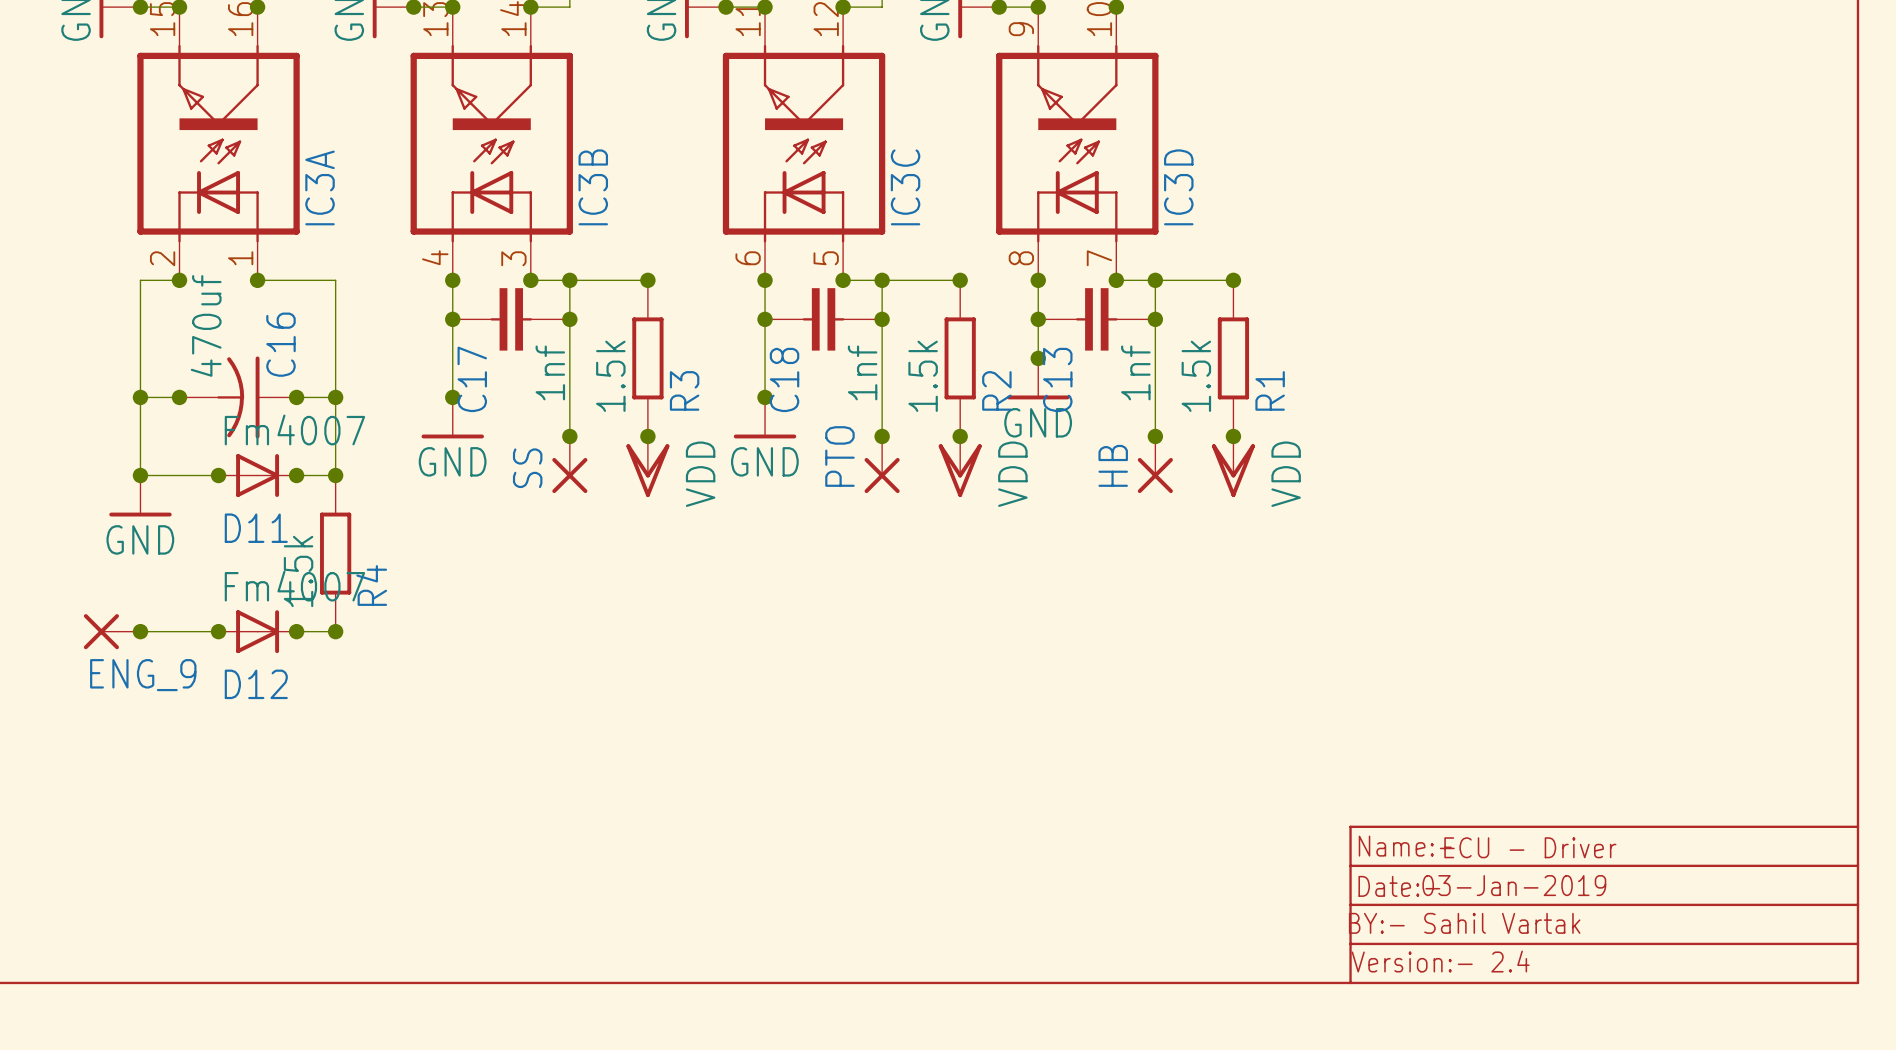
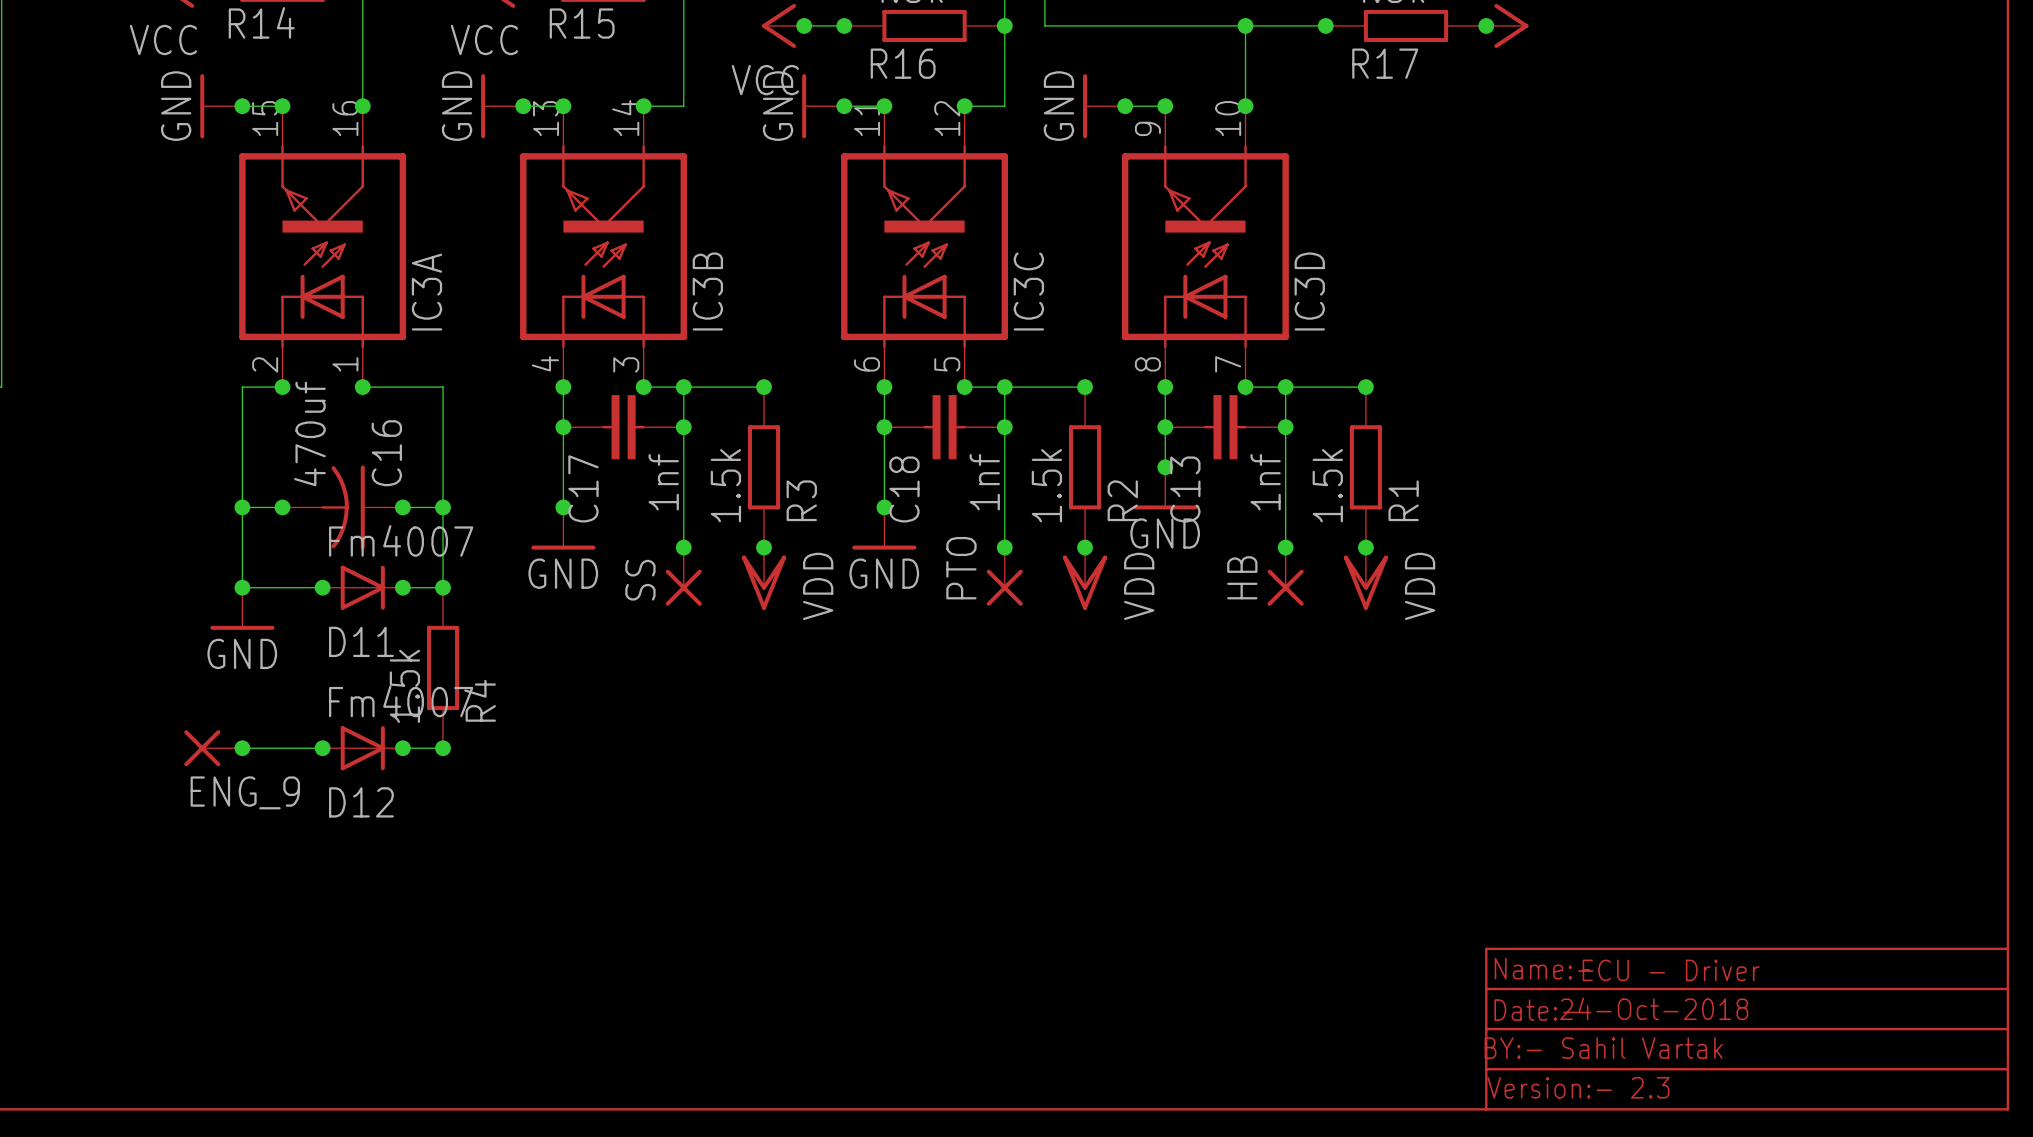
text: 03-Jan-2019 (1514, 885) -> 24-Oct-2018 (1654, 1008)
text: Version:- 2.4 (1440, 961) -> Version:- 2.3 (1578, 1087)

